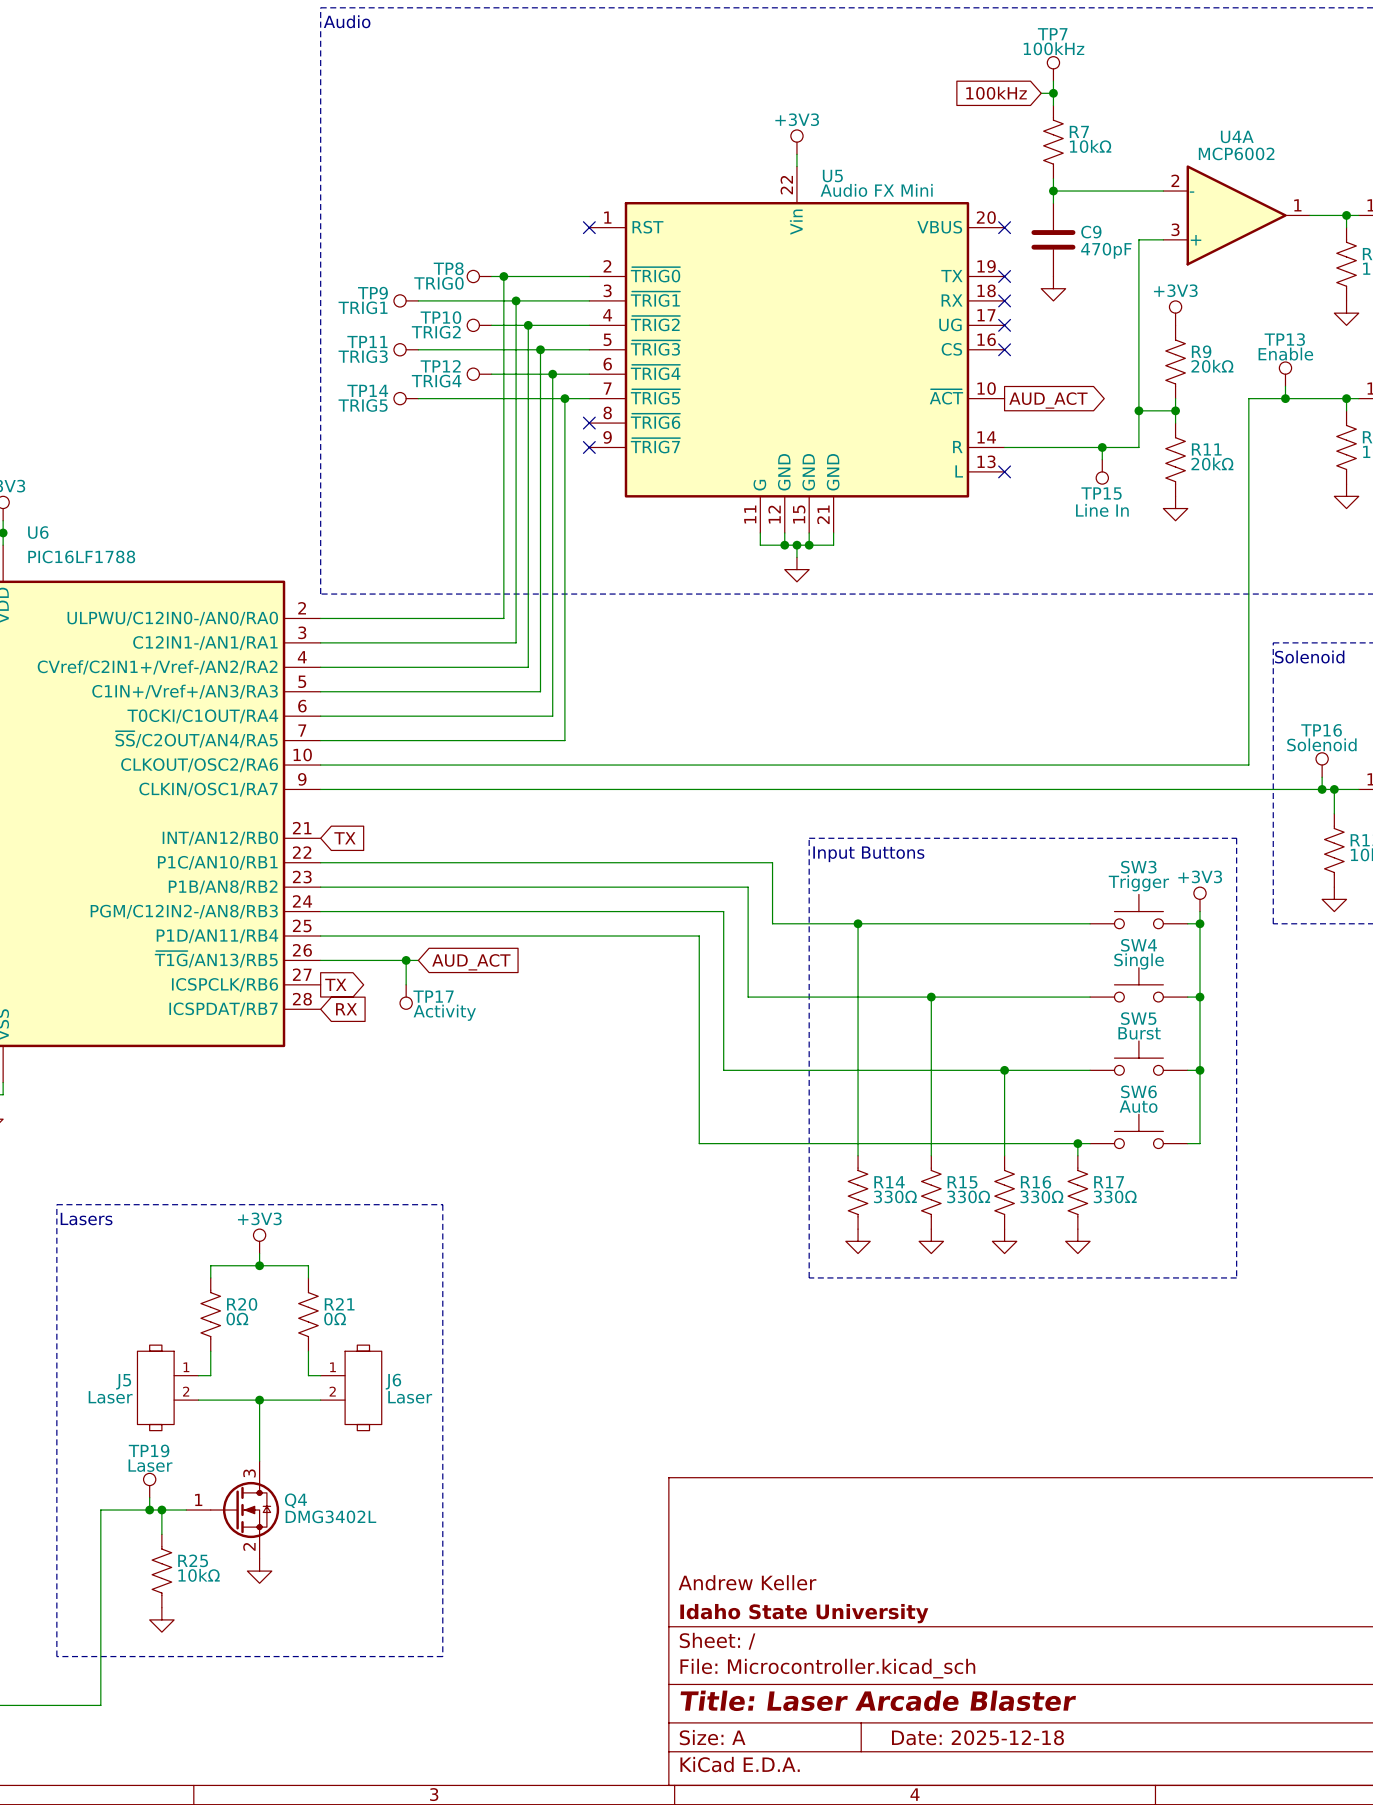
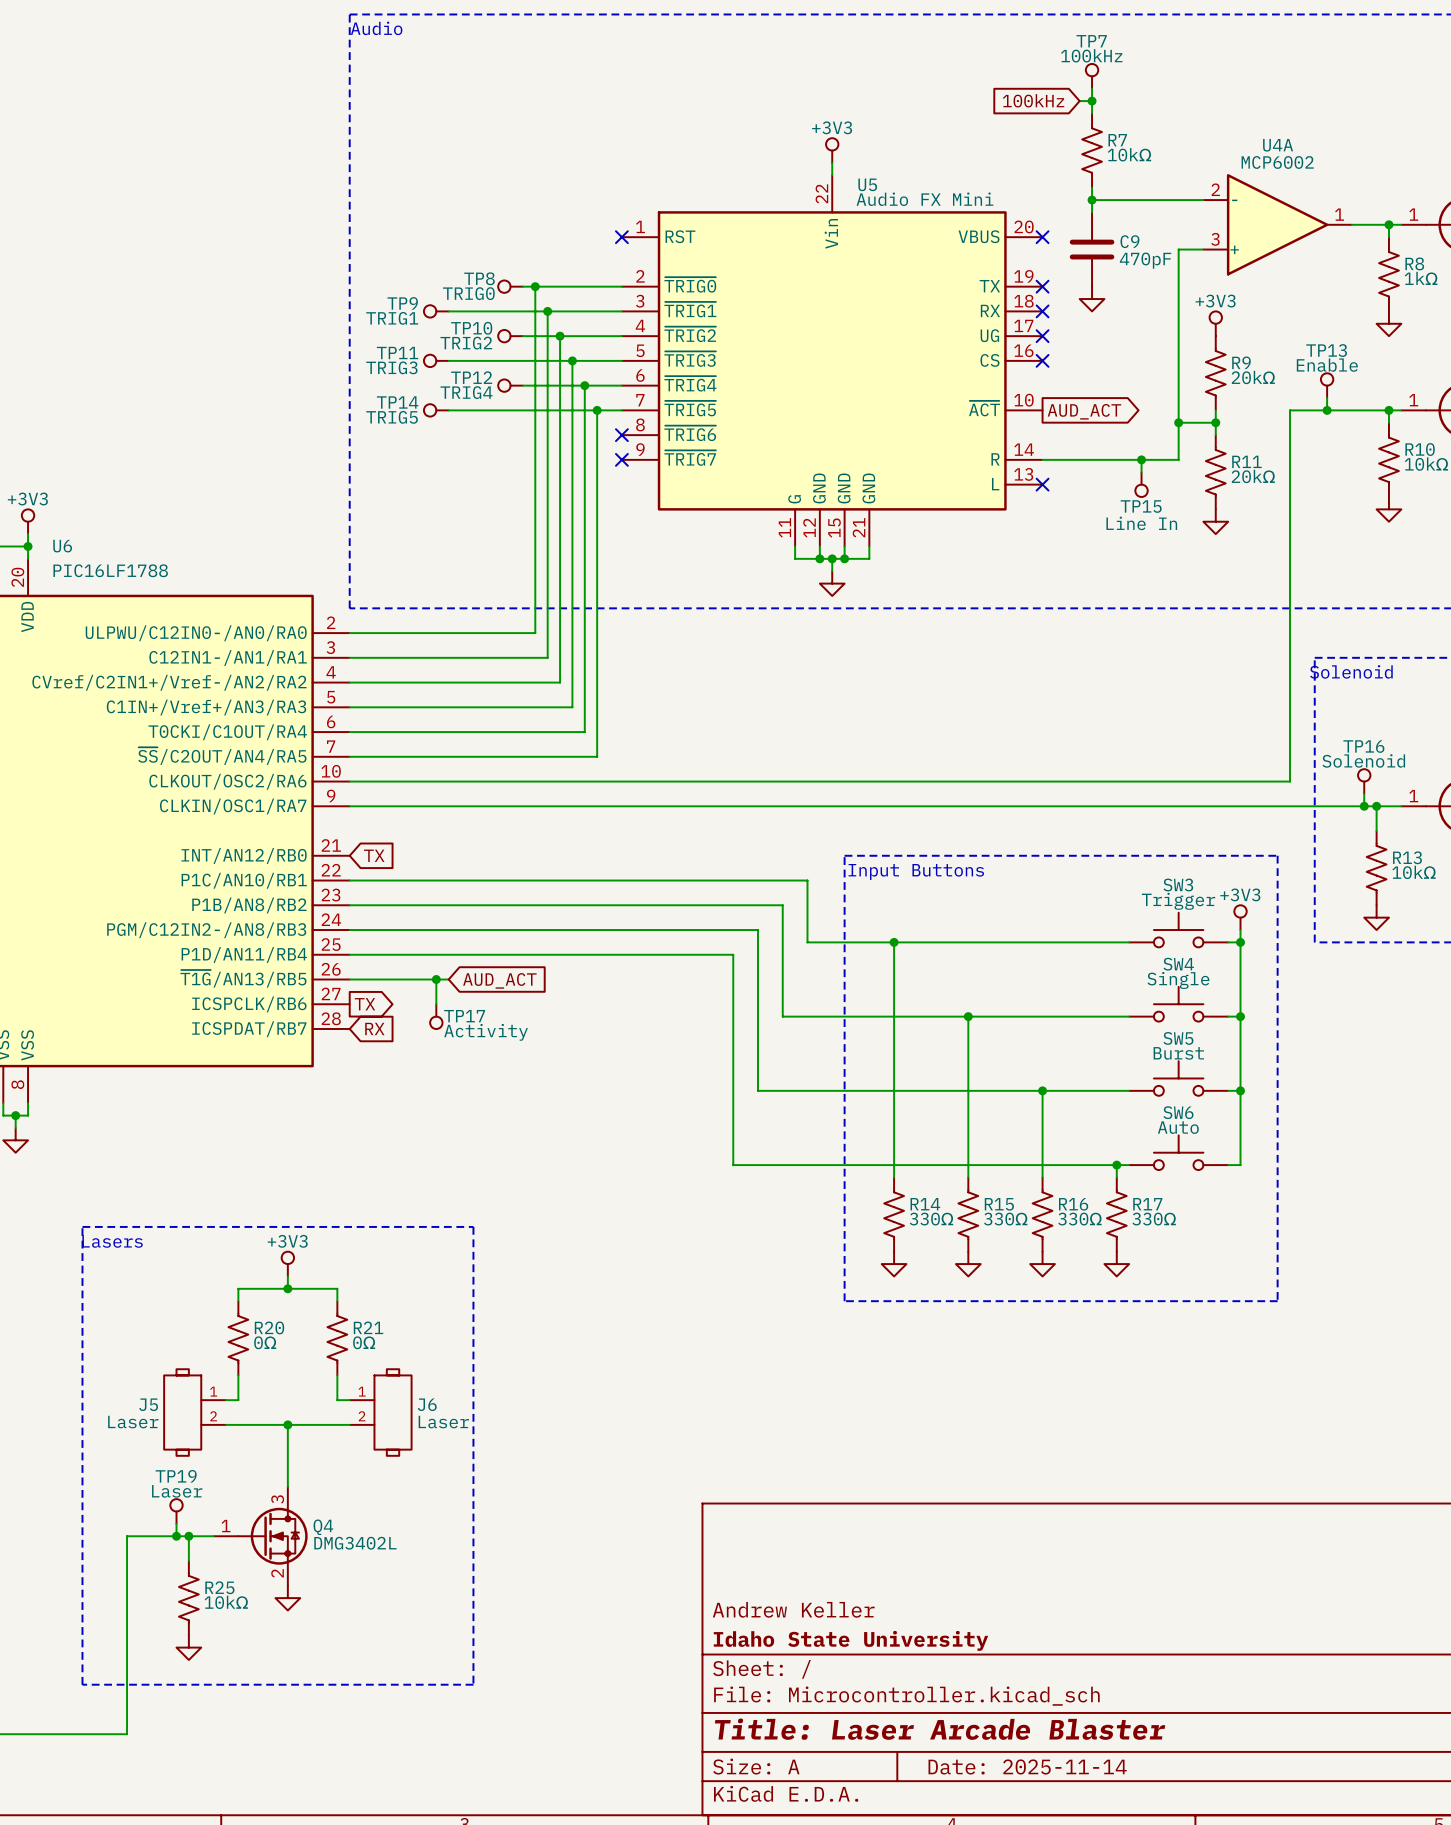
title block: Date: 2025-12-18 (977, 1737) -> Date: 2025-11-14 (1027, 1766)

